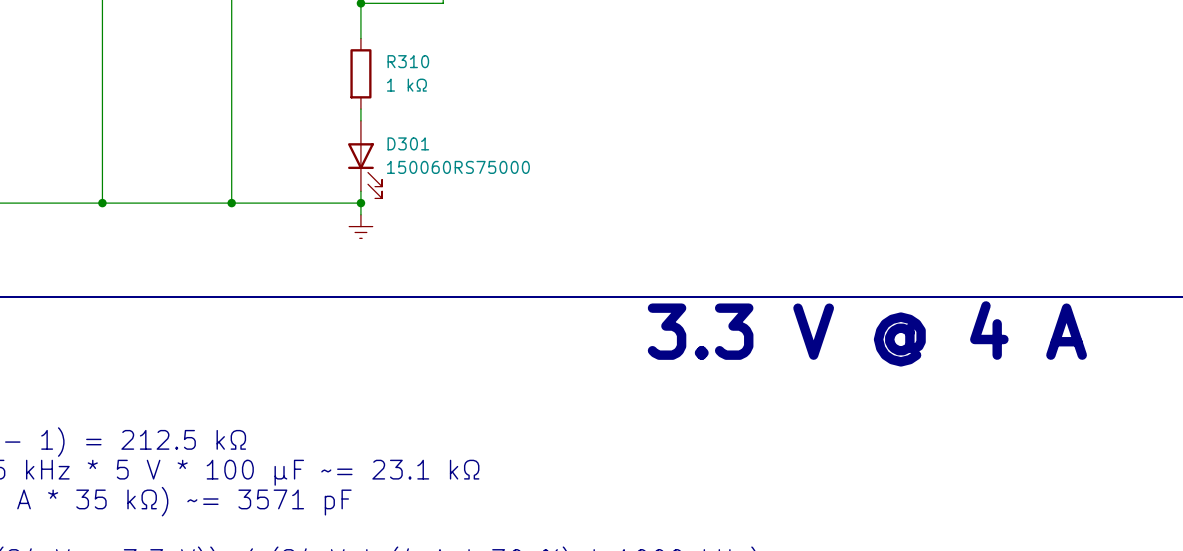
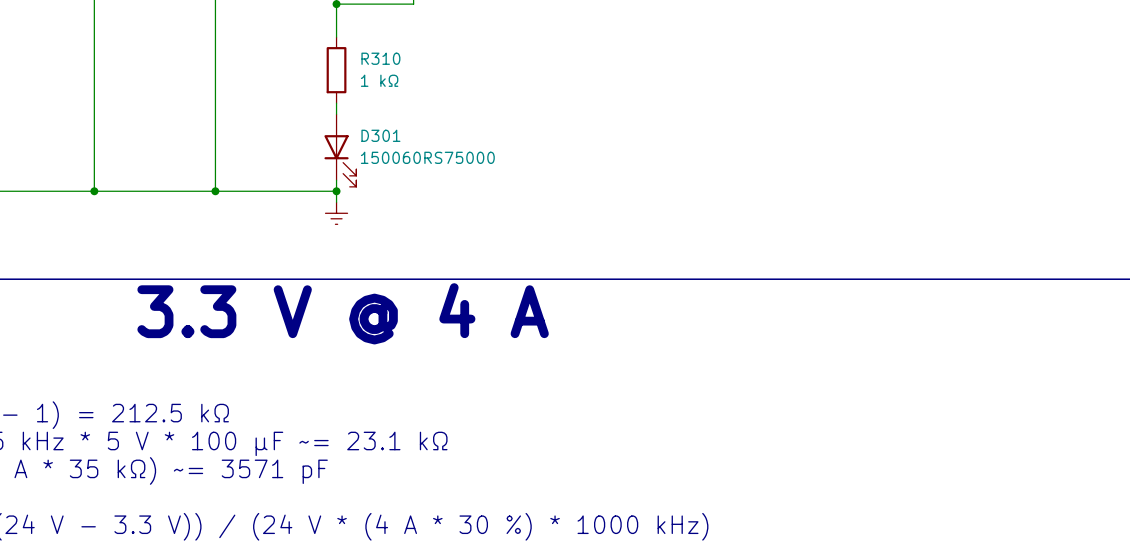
text: none -> 3.3 V @ 4 A (343, 313)
text: 3.3 V @ 4 A (867, 333) -> none

